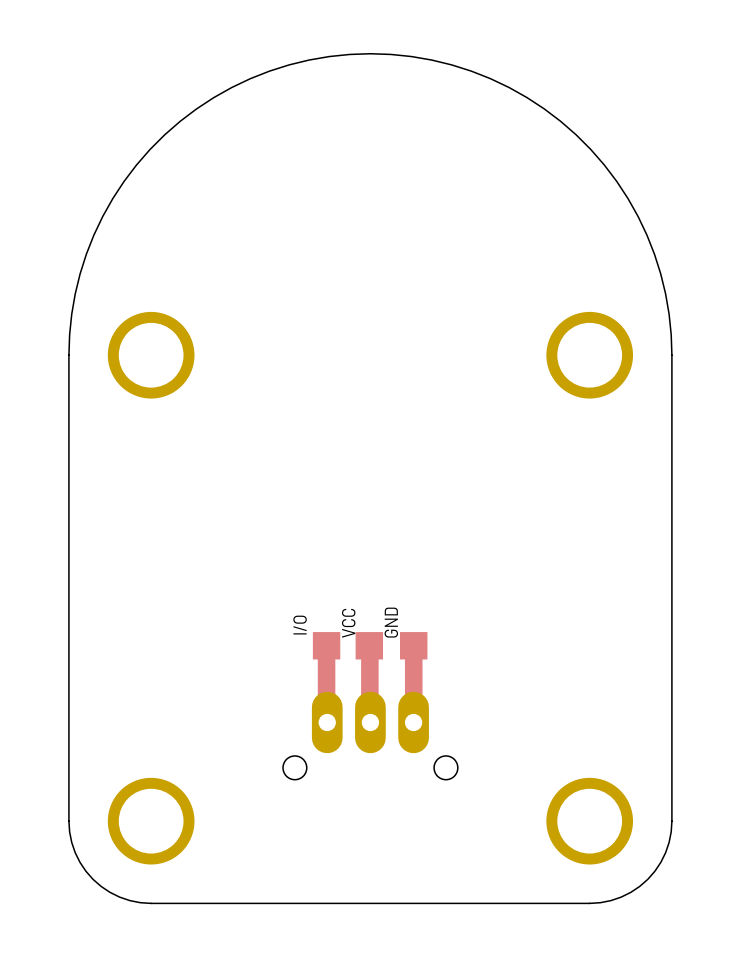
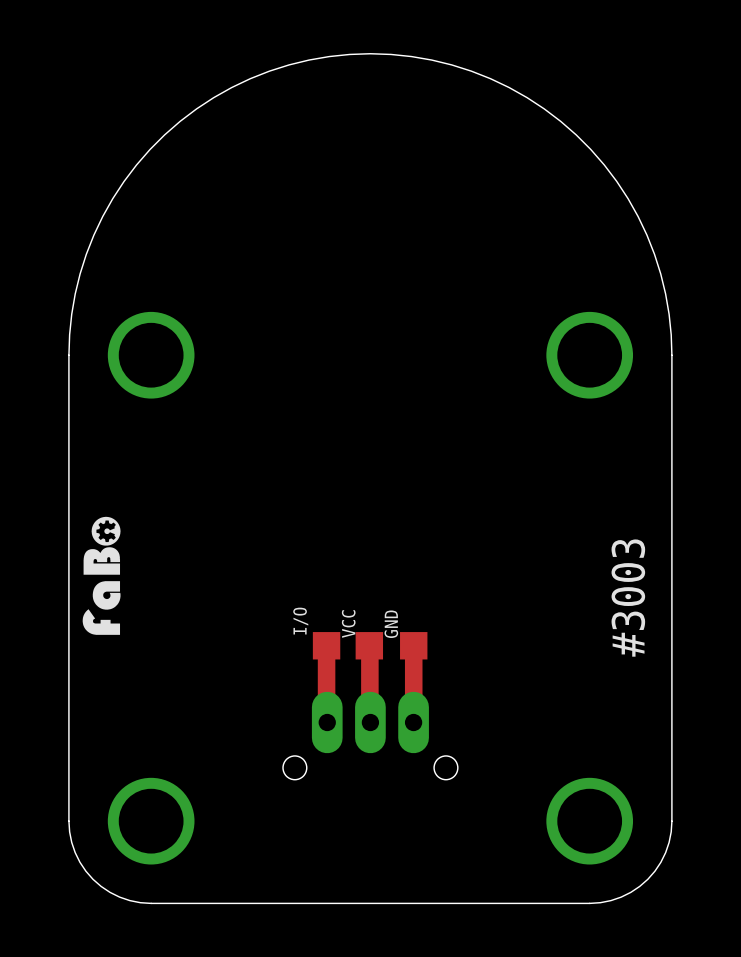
drawing: none -> [82, 516, 121, 635]
text: none -> #3003 (628, 598)

